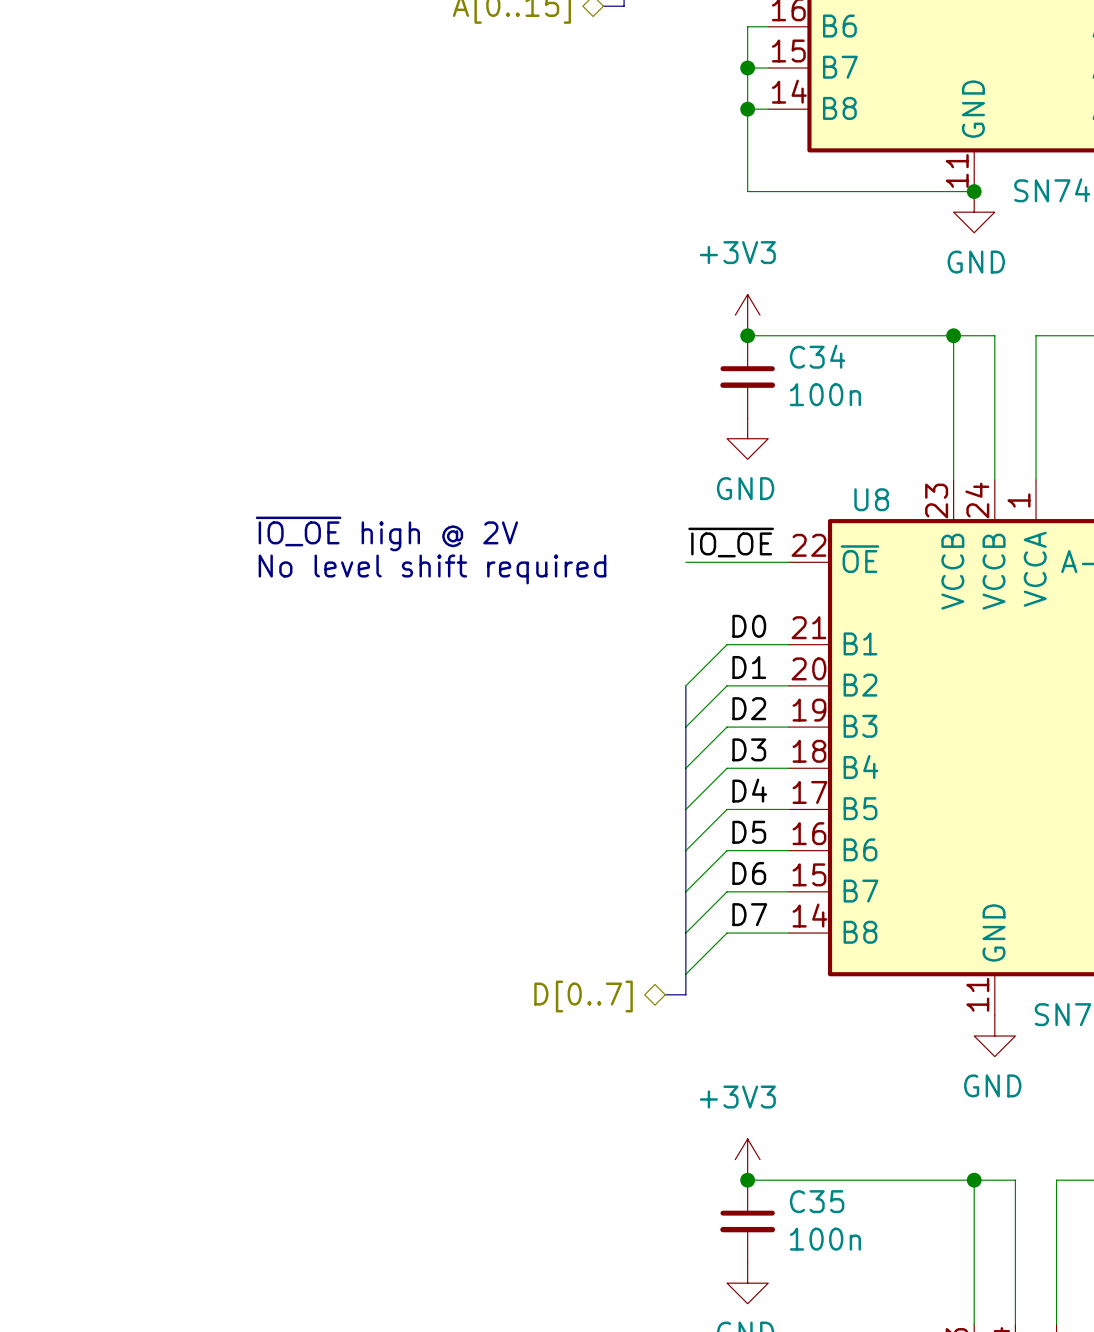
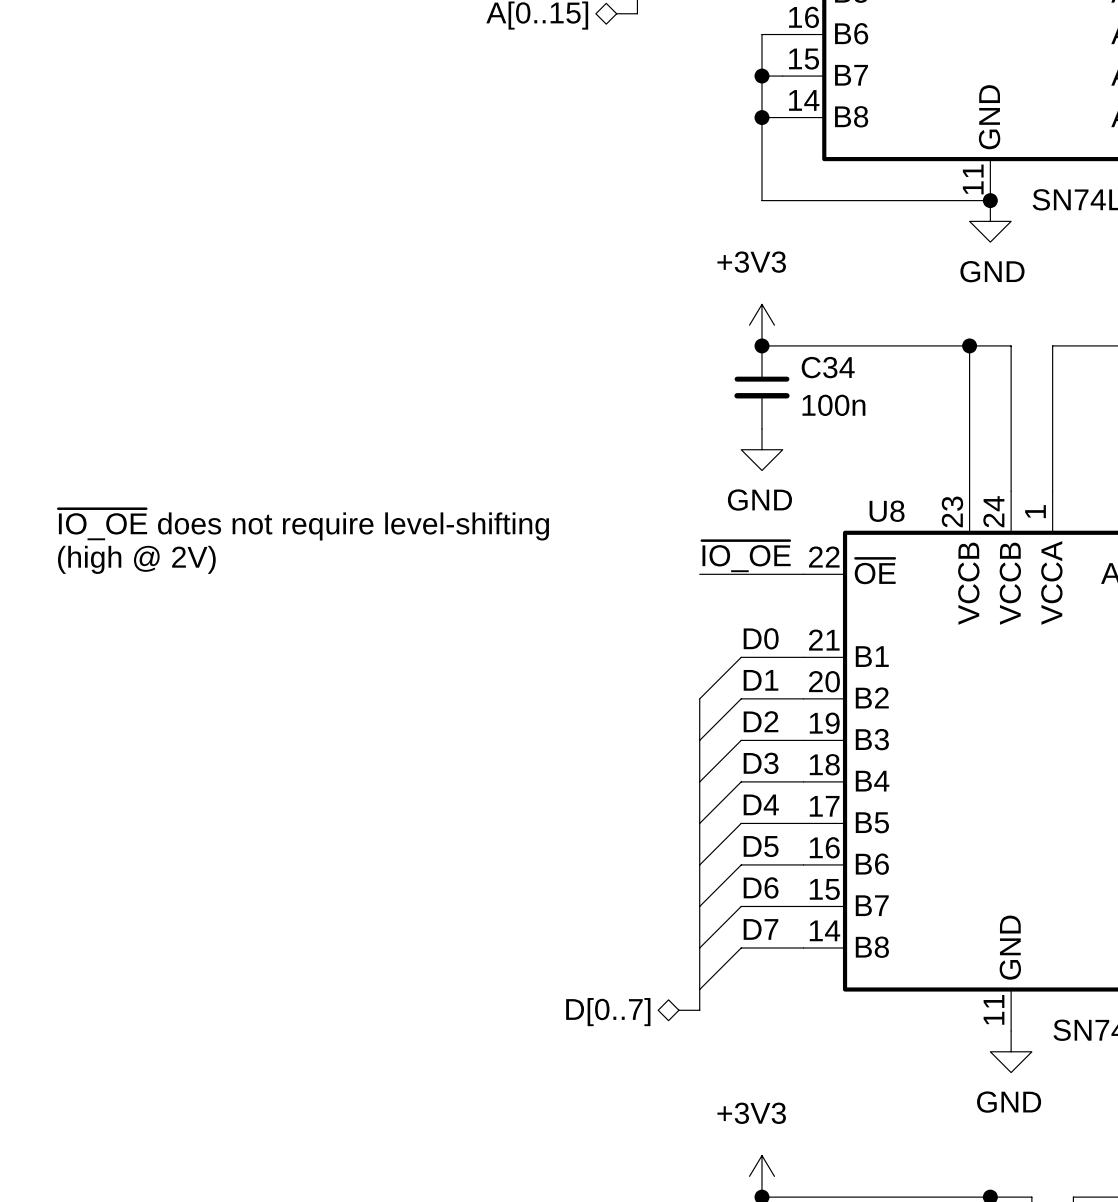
text: none -> ~{IO_OE} does not require level-shifting (303, 524)
text: ~{IO_OE} high @ 2V (386, 533) -> (high @ 2V) (136, 559)
text: No level shift required (432, 569) -> none

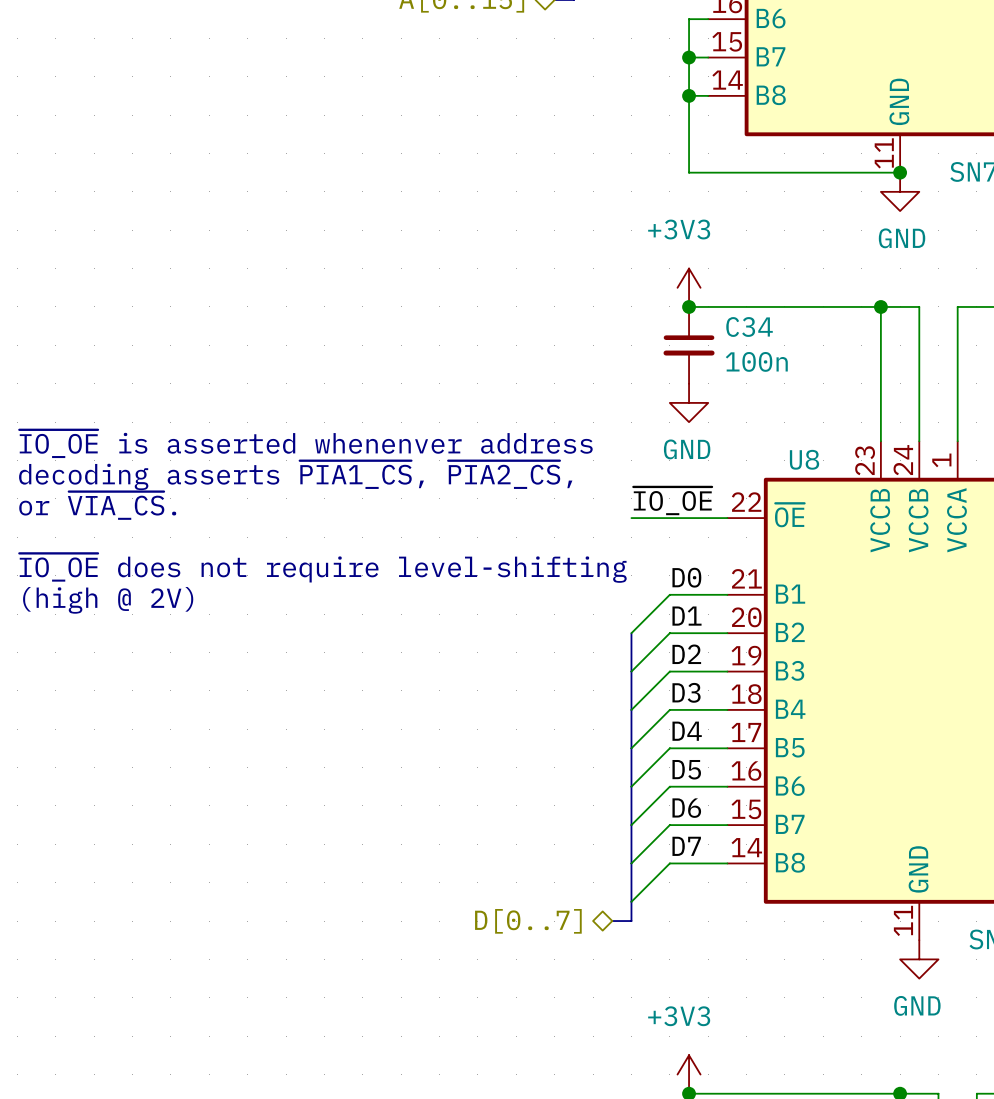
text: none -> ~{IO_OE} is asserted whenenver address (306, 443)
text position: ~{IO_OE} does not require level-shifting (303, 524) -> ~{IO_OE} does not require level-shifting (323, 568)
text: none -> decoding asserts ~{PIA1_CS}, ~{PIA2_CS}, (295, 475)
text position: (high @ 2V) (136, 559) -> (high @ 2V) (108, 600)
text: none -> or ~{VIA_CS}. (97, 505)

